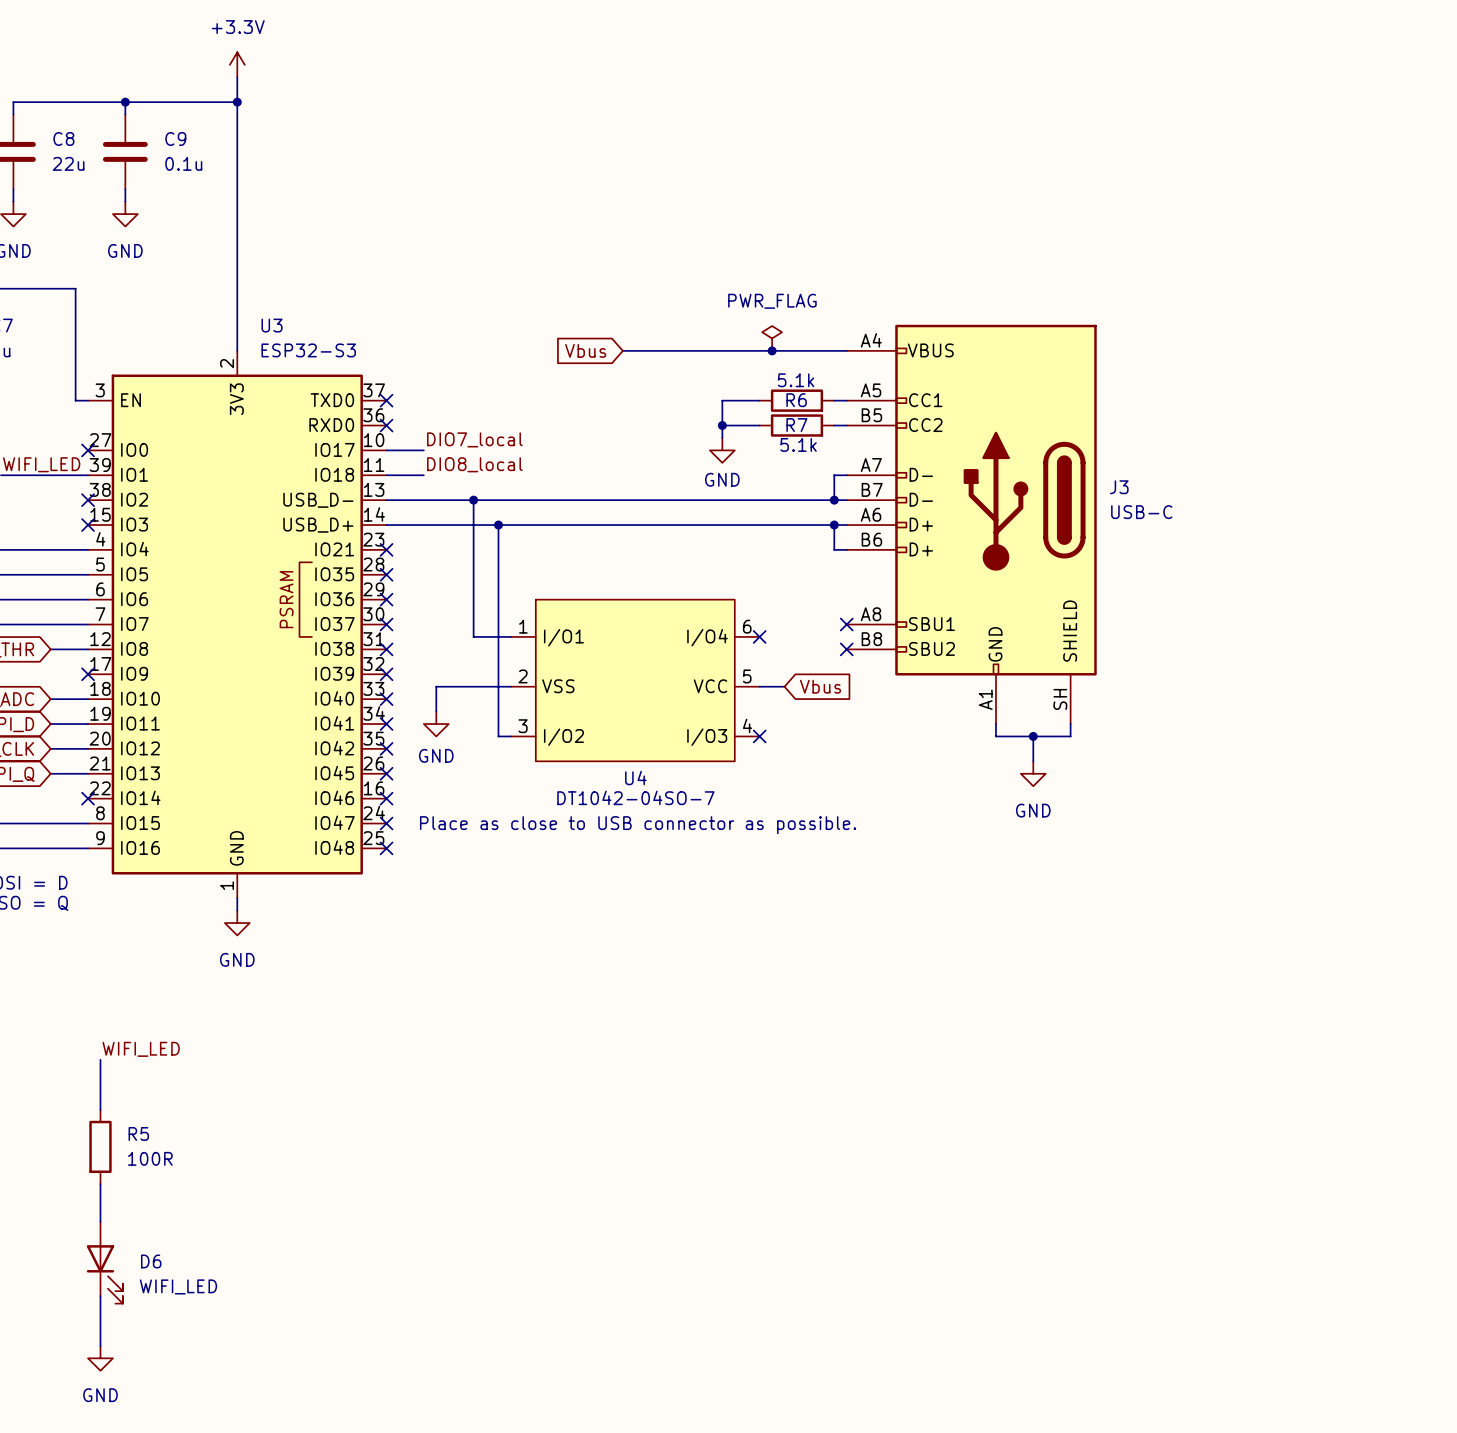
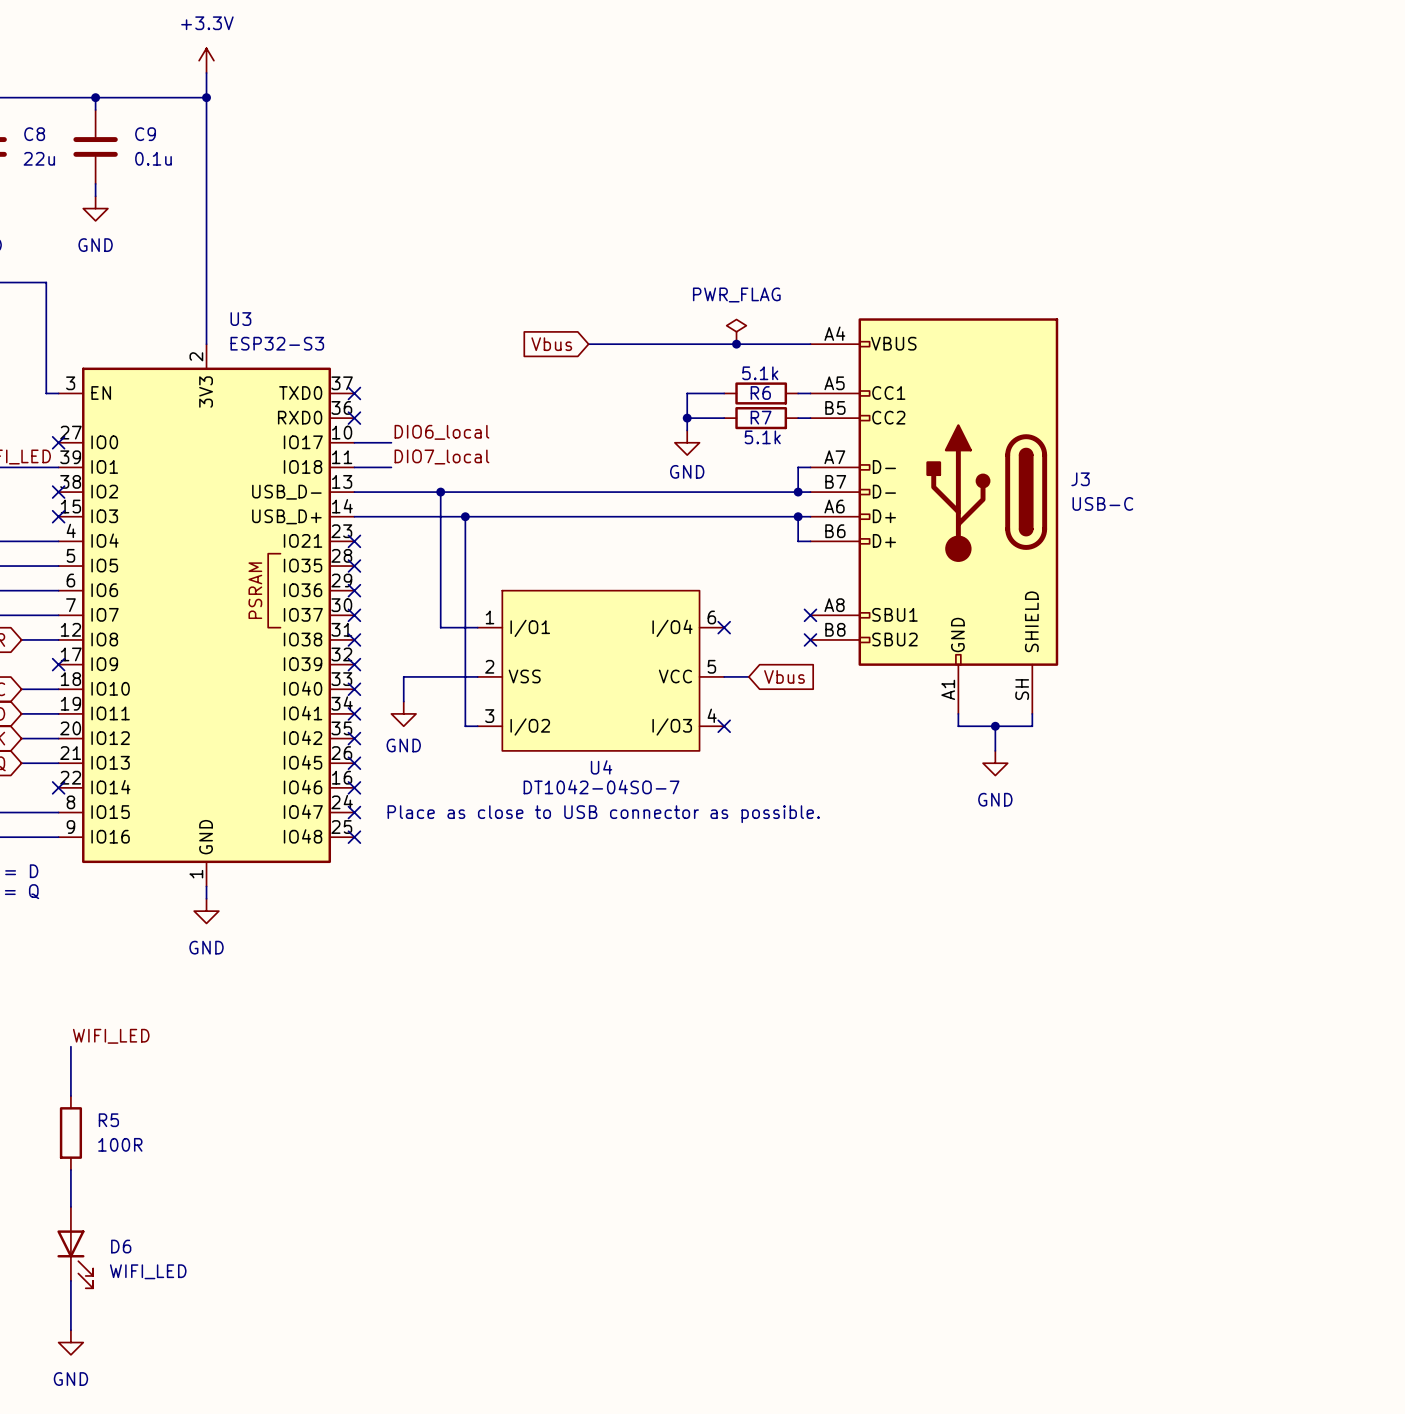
label: DIO7_local (474, 439) -> DIO6_local (441, 432)
label: DIO8_local (474, 464) -> DIO7_local (441, 457)

